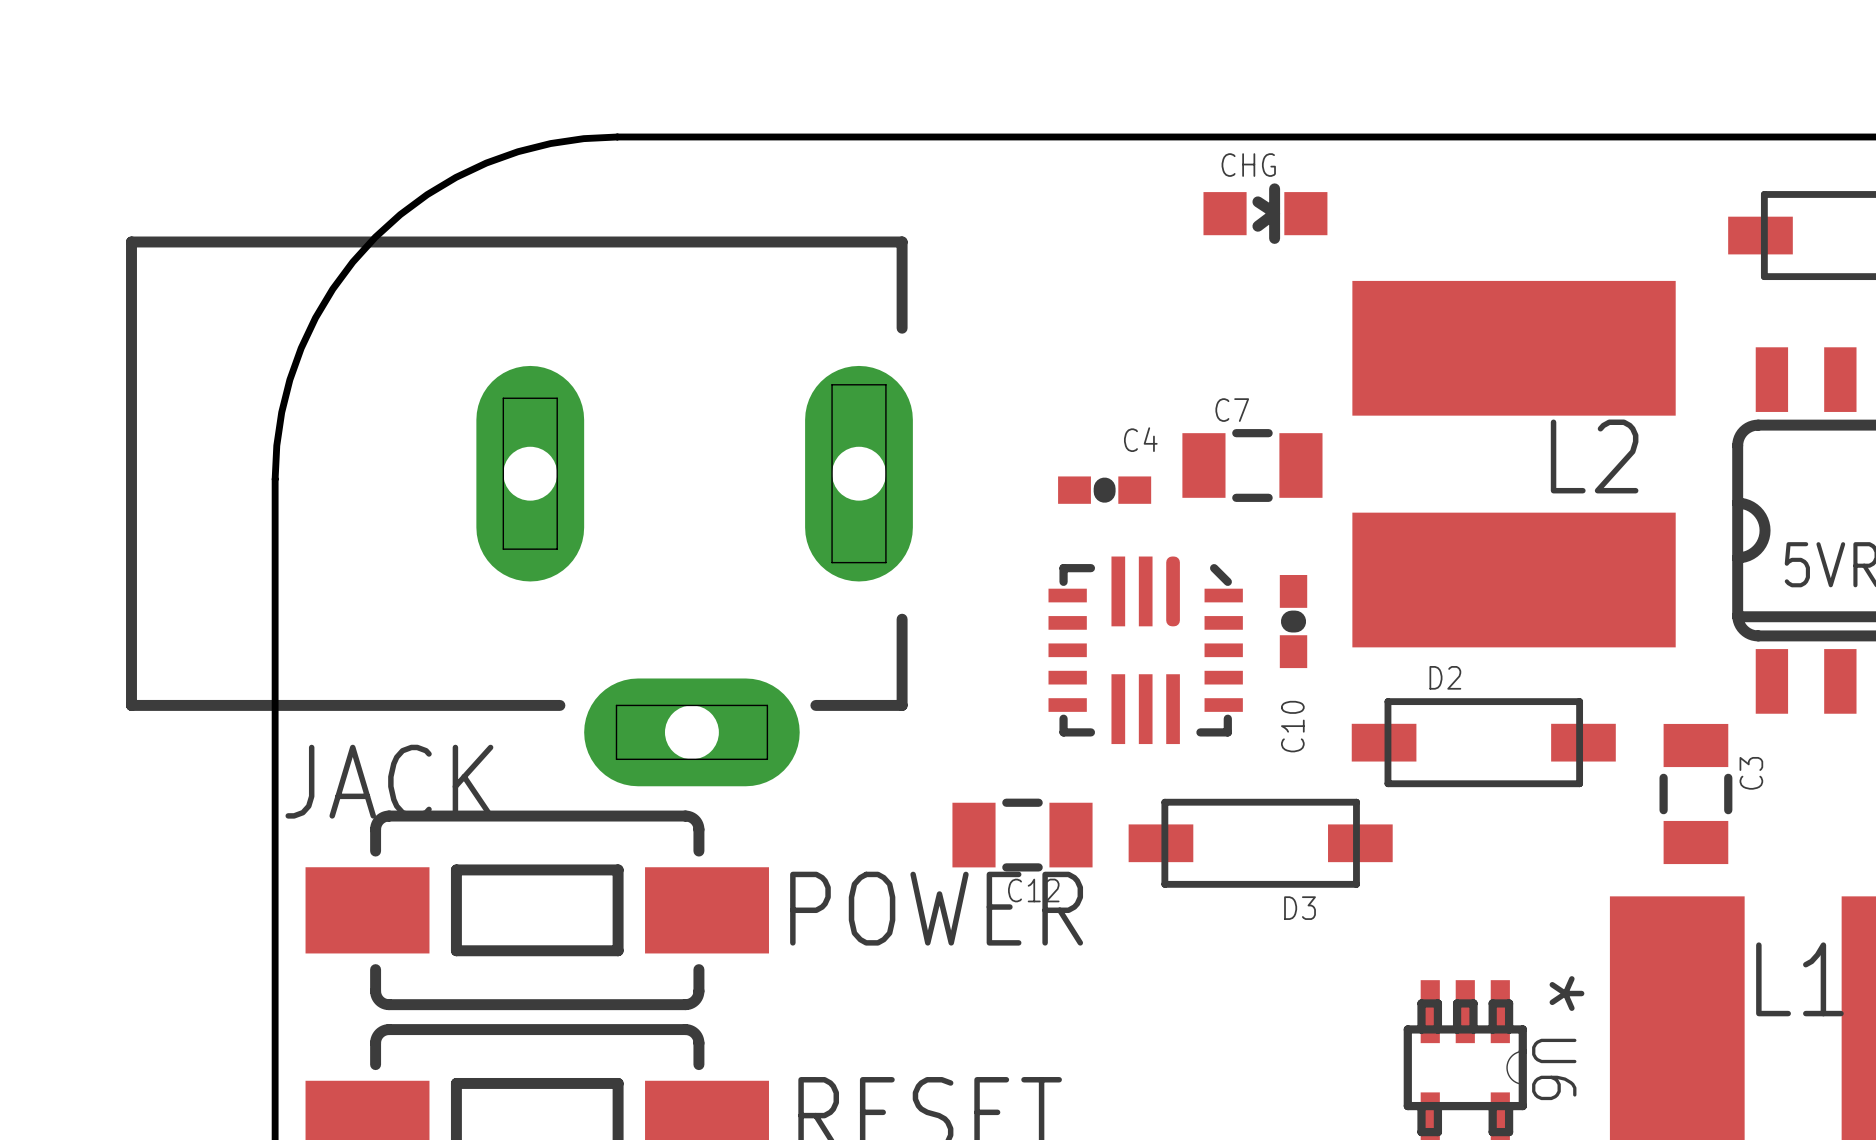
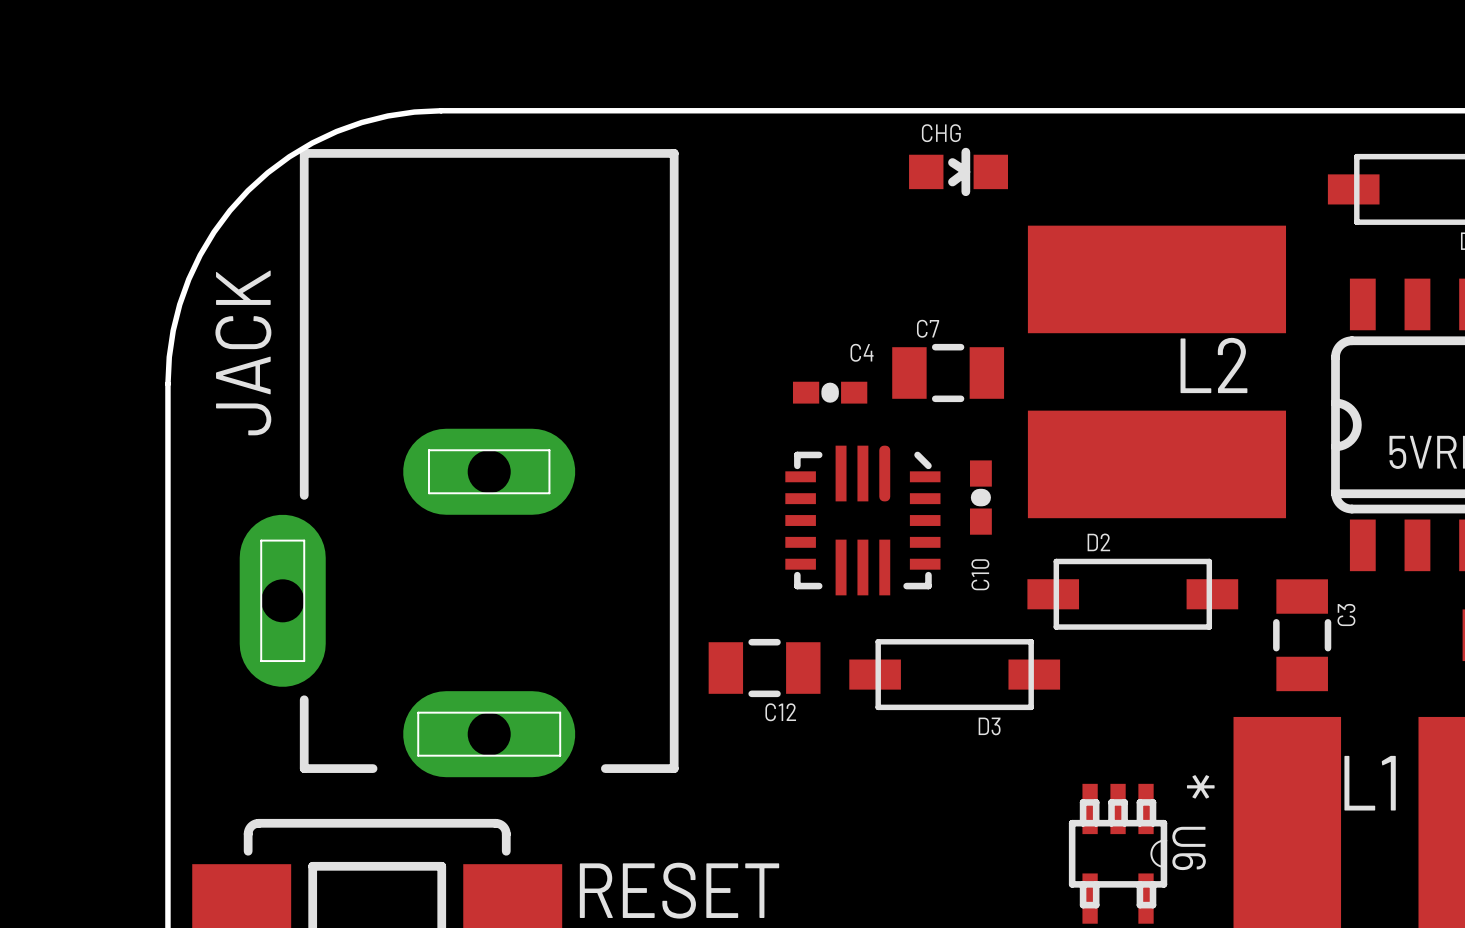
JACK rotation: 0° (519, 511) -> 90° clockwise (459, 463)
POWER: (537, 910) -> none

